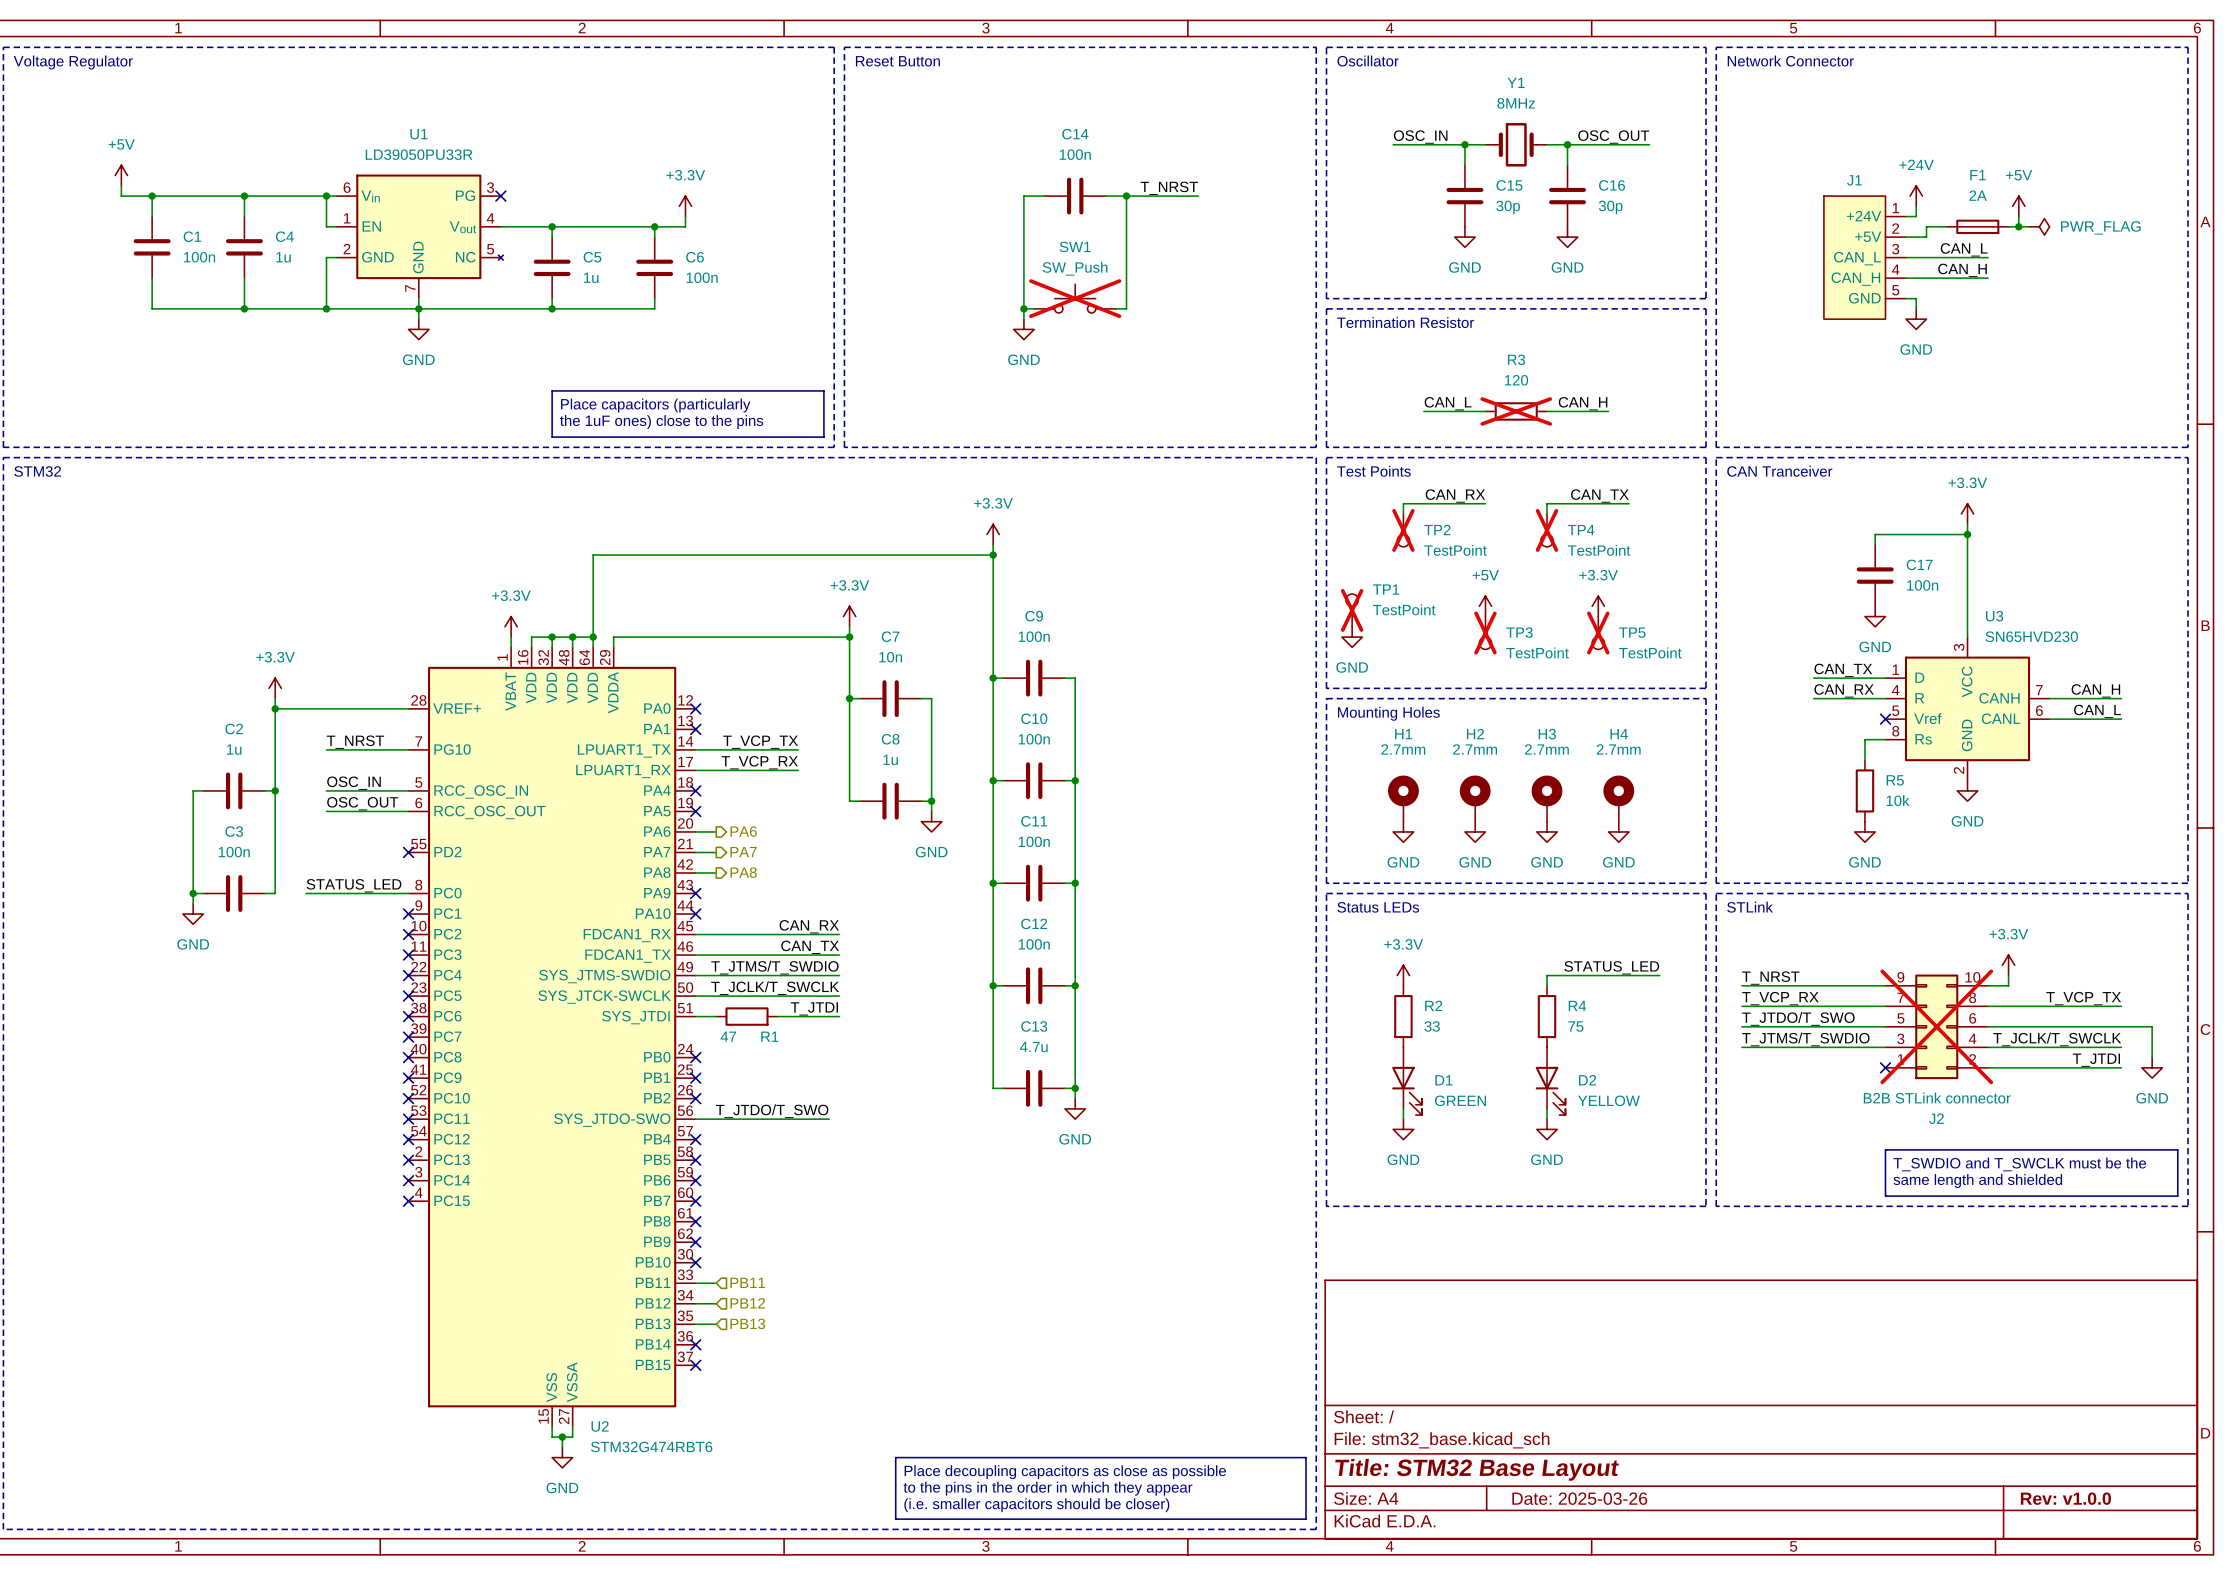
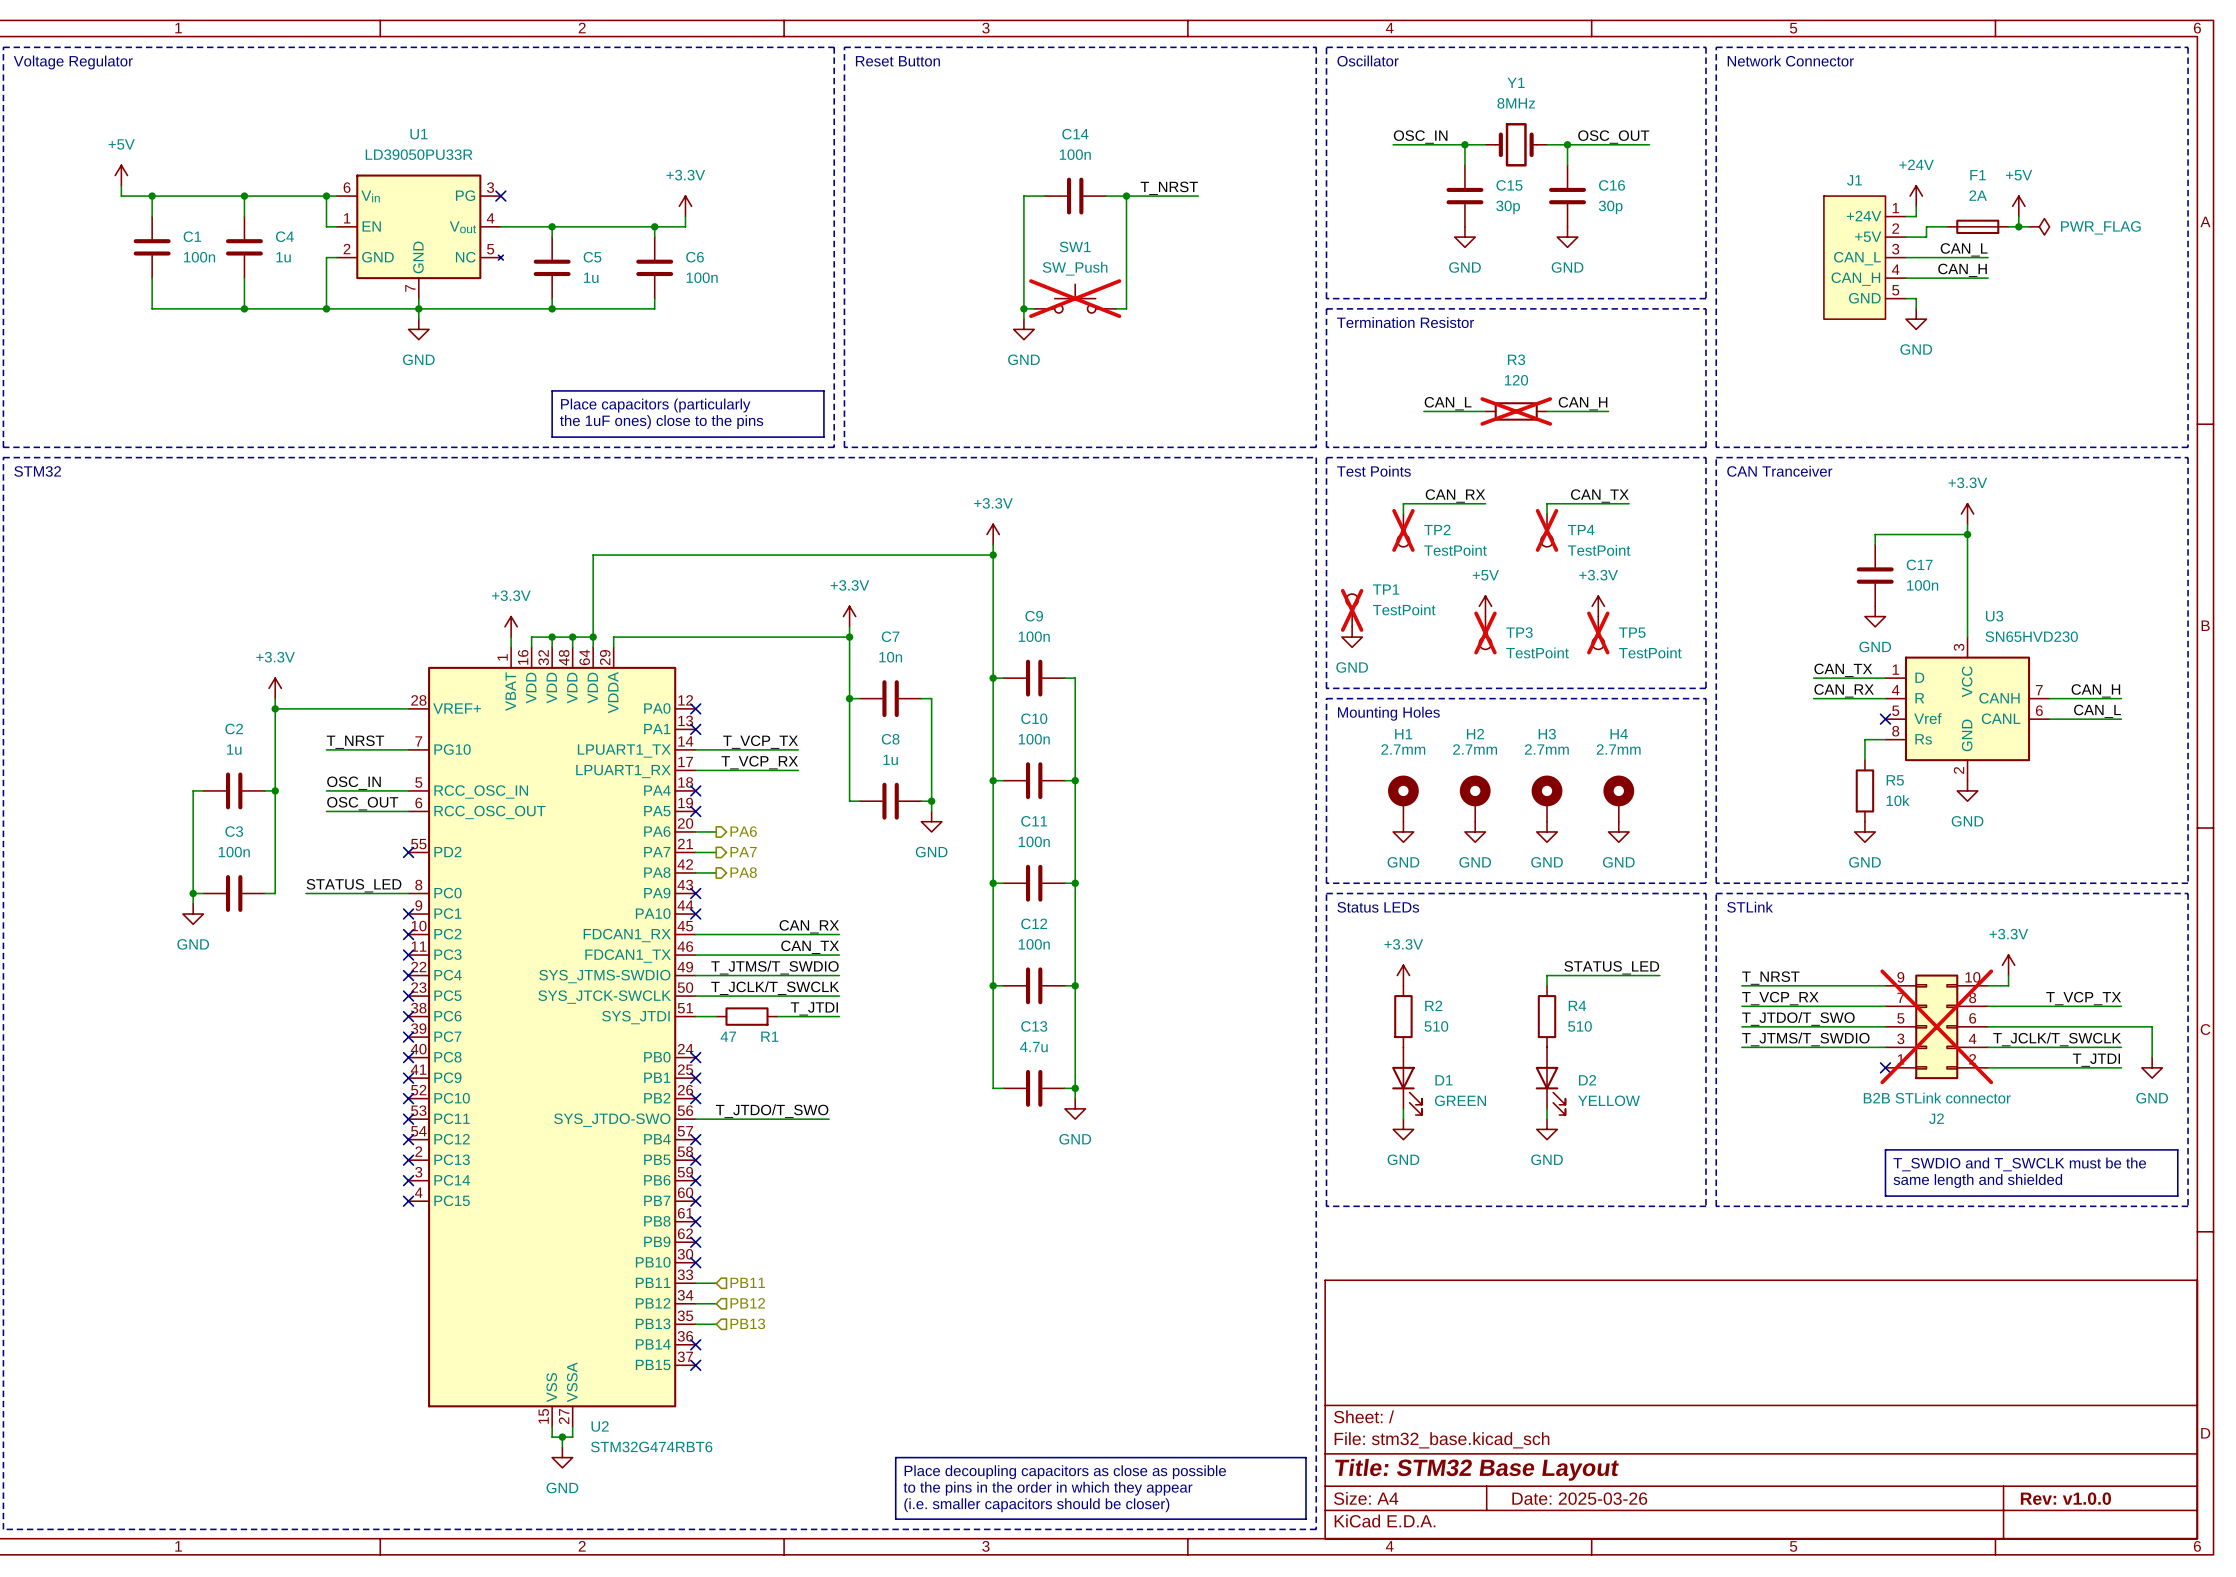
R2 value: 33 (1432, 1026) -> 510 (1436, 1026)
R4 value: 75 (1575, 1026) -> 510 (1579, 1026)

